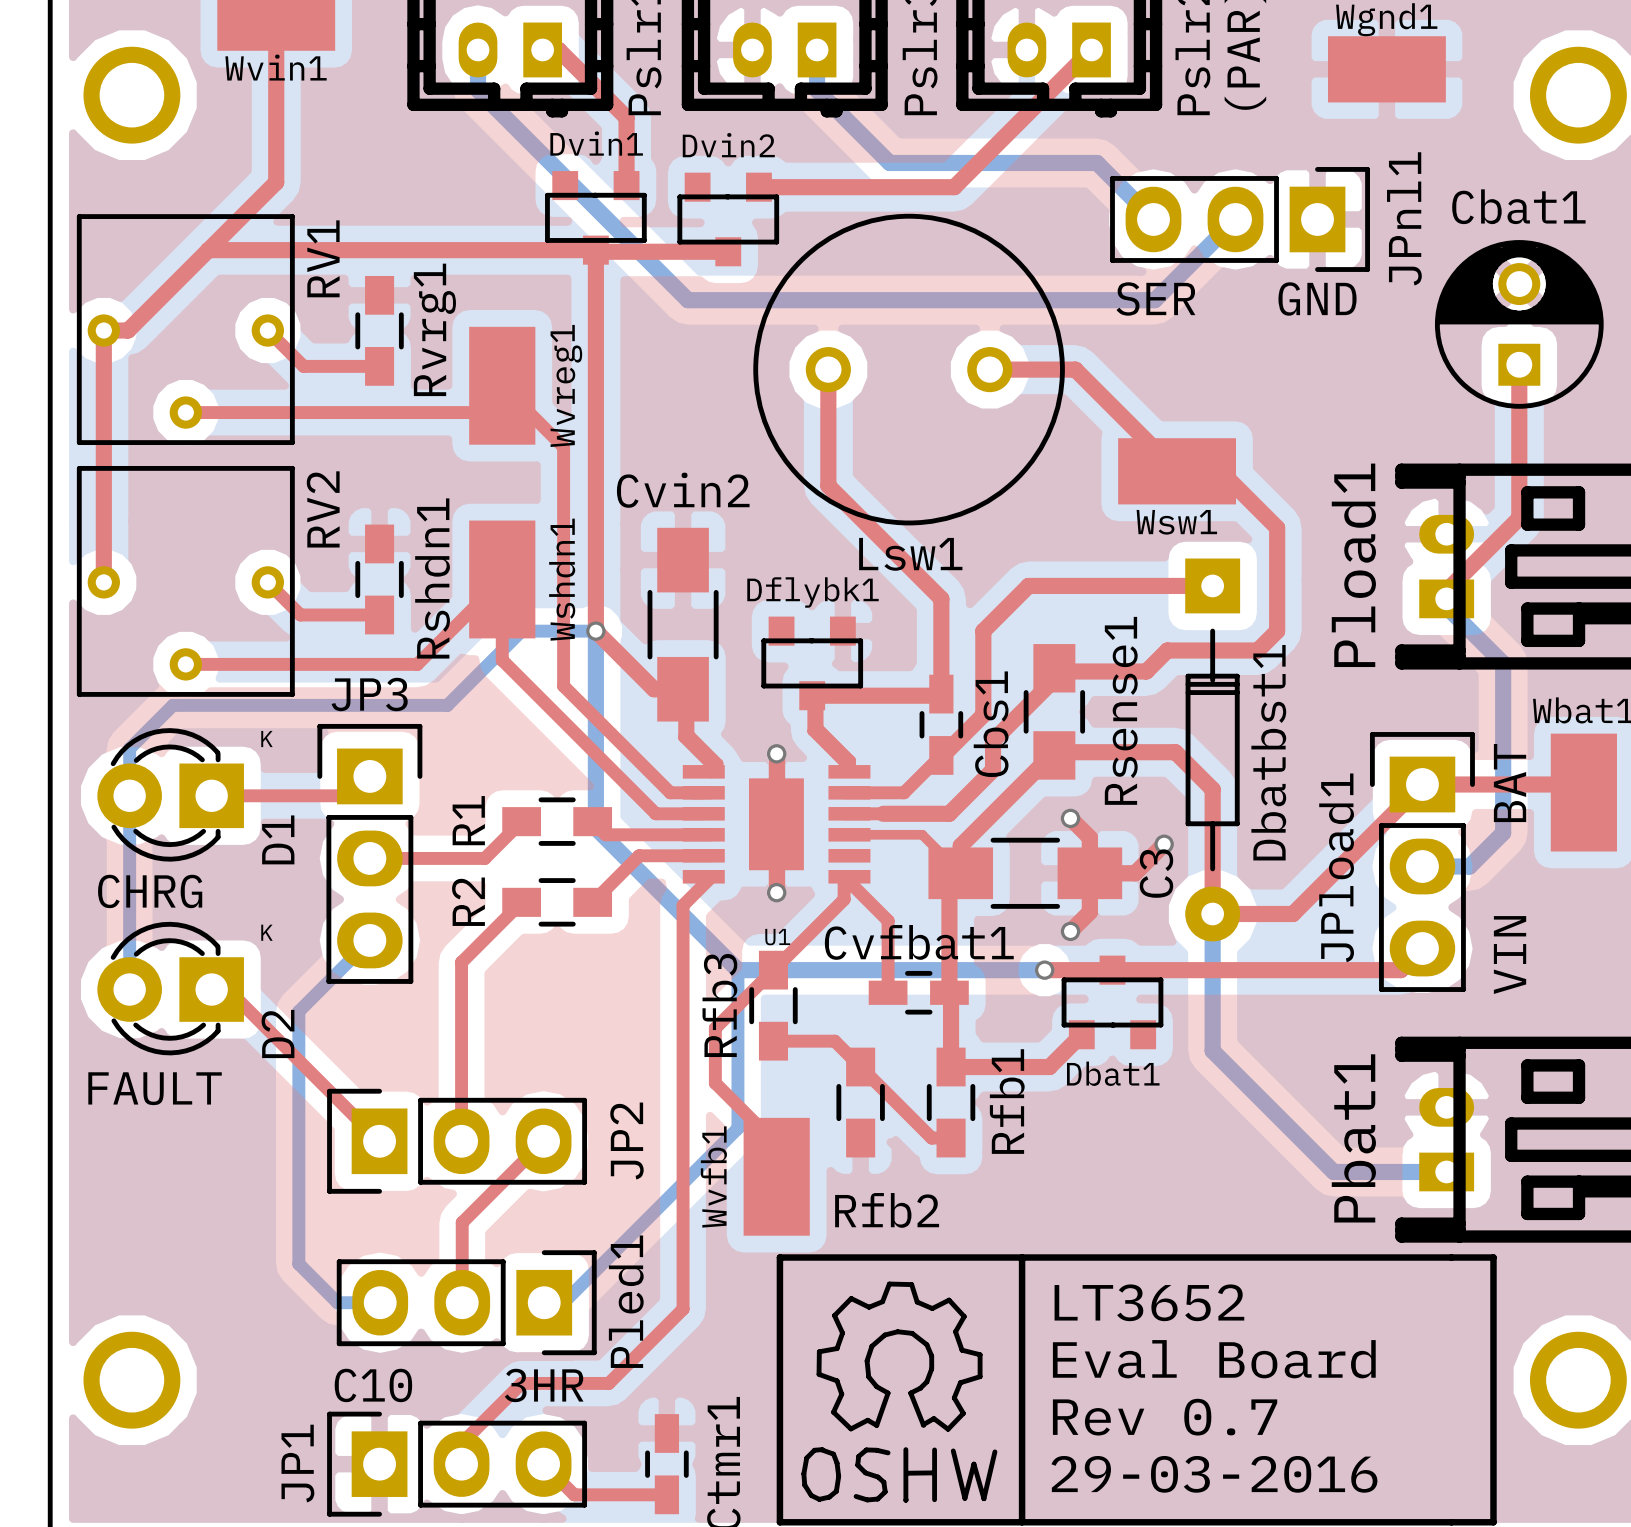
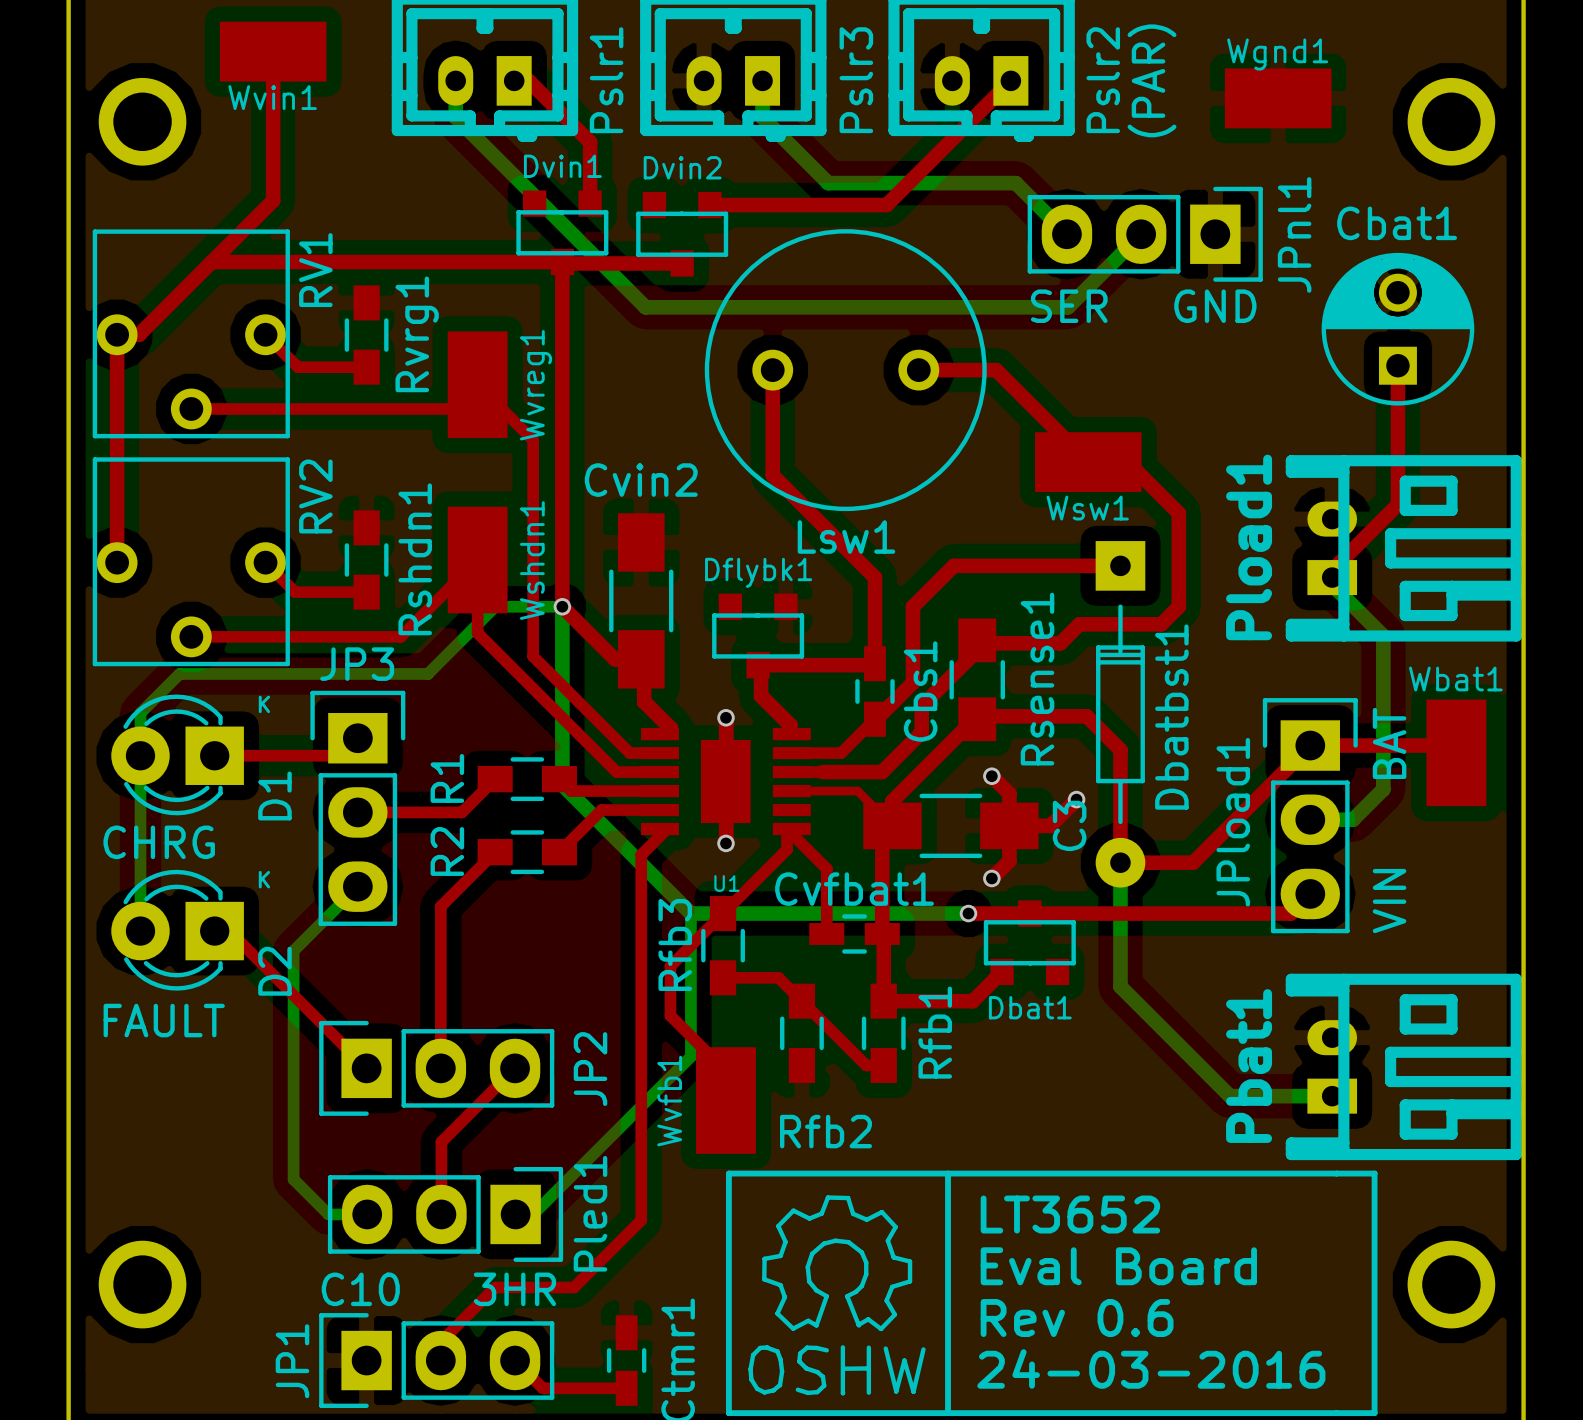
RV1 footprint: [76, 214, 295, 446] -> [92, 229, 290, 439]
RV2 footprint: [76, 465, 295, 697] -> [92, 457, 290, 667]
text: Rev 0.7 (1165, 1417) -> Rev 0.6 (1077, 1318)
text: 29-03-2016 (1214, 1474) -> 24-03-2016 (1151, 1368)

